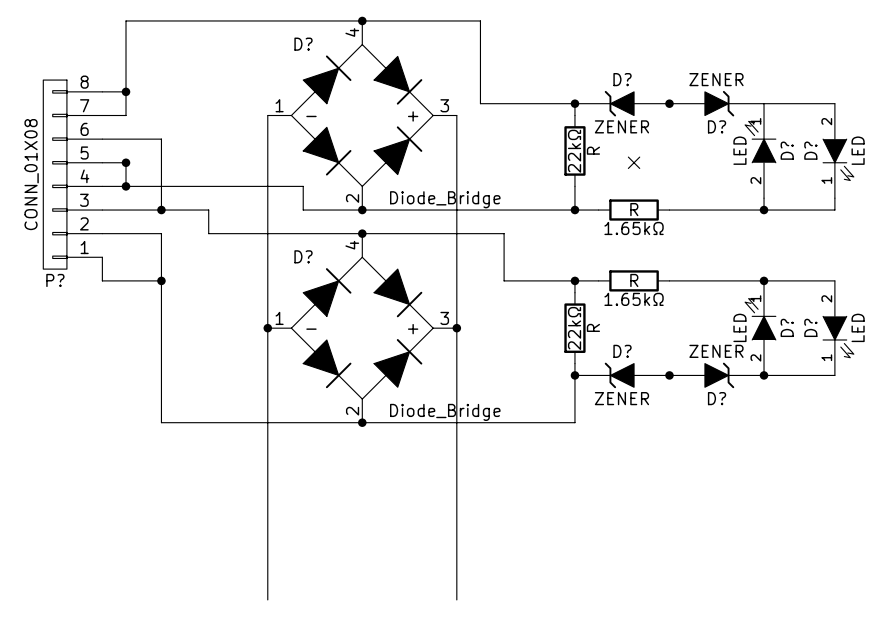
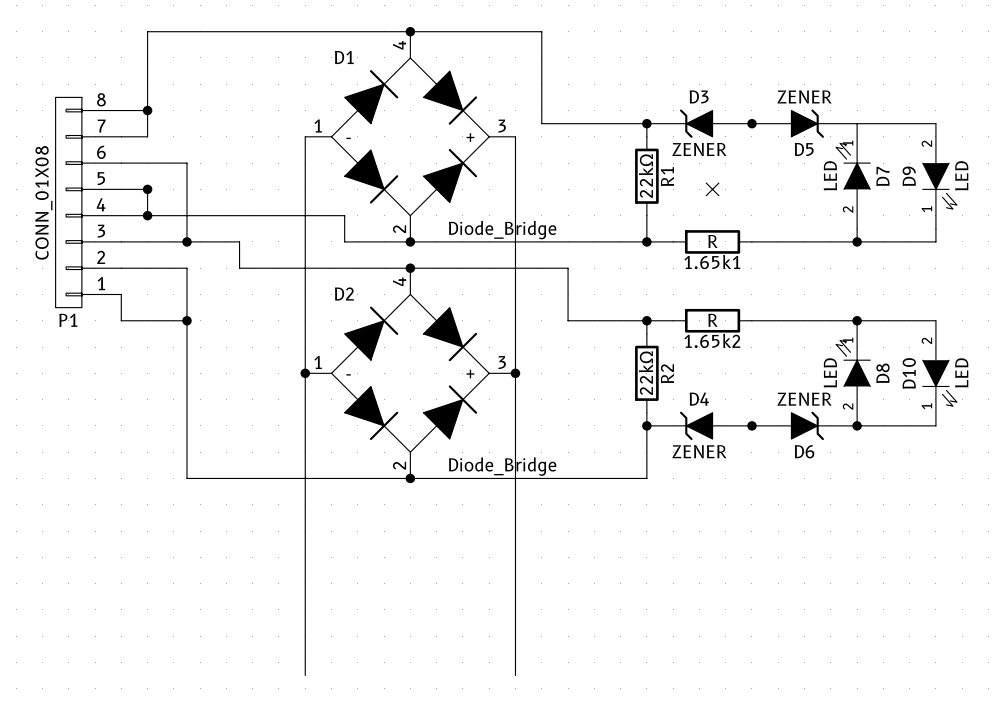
D? name: D? (303, 44) -> D1 (344, 57)
D? name: D? (622, 79) -> D3 (699, 96)
D? name: D? (717, 126) -> D5 (804, 149)
R name: R (593, 150) -> R1 (667, 176)
D? name: D? (787, 150) -> D7 (882, 176)
D? name: D? (810, 150) -> D9 (909, 176)
1.65kΩ name: 1.65kΩ (634, 228) -> 1.65k1 (712, 262)
D? name: D? (303, 256) -> D2 (344, 294)
P? name: P? (55, 280) -> P1 (68, 320)
1.65kΩ name: 1.65kΩ (634, 299) -> 1.65k2 (712, 340)
R name: R (593, 327) -> R2 (667, 373)
D? name: D? (787, 327) -> D8 (882, 373)
D? name: D? (810, 327) -> D10 (909, 373)
D? name: D? (622, 351) -> D4 (699, 399)
D? name: D? (717, 398) -> D6 (804, 451)

